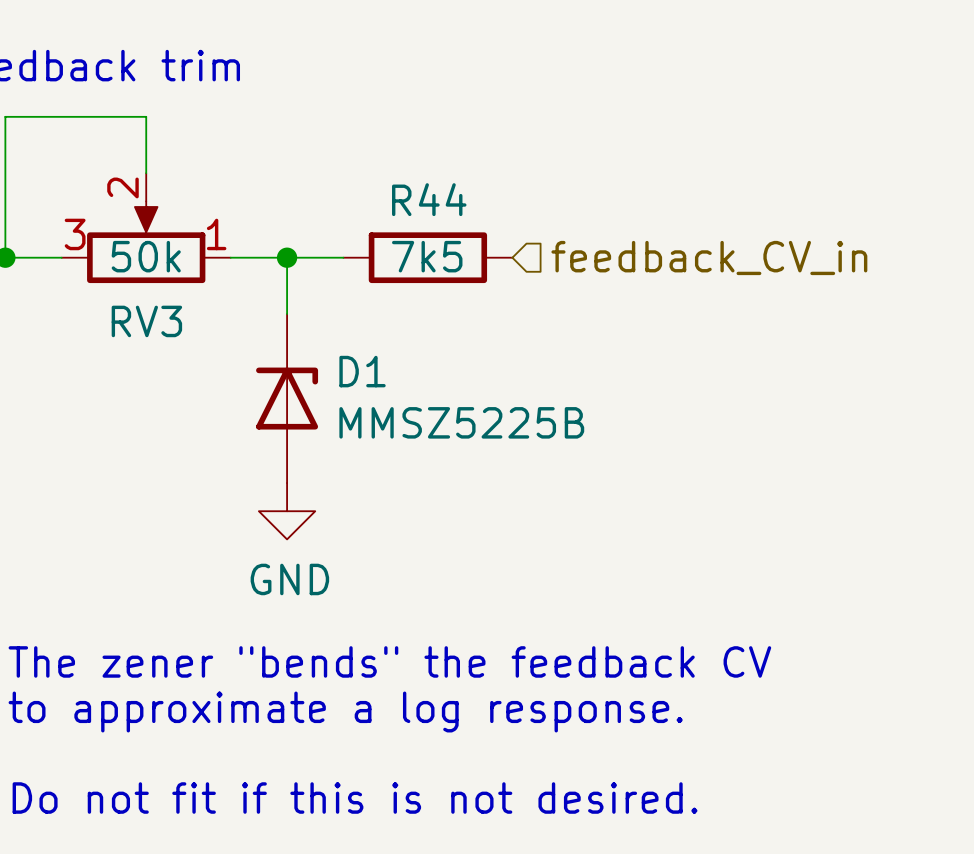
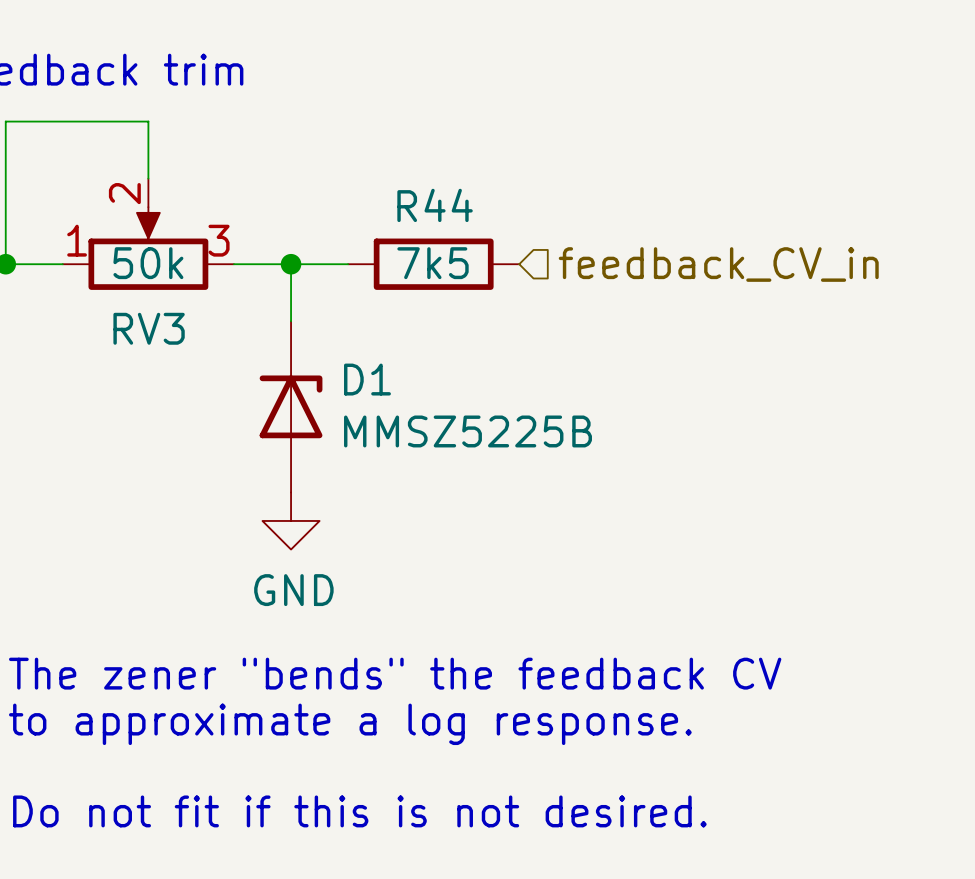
RV3 flip: as is (146, 242) -> left-right (148, 248)

